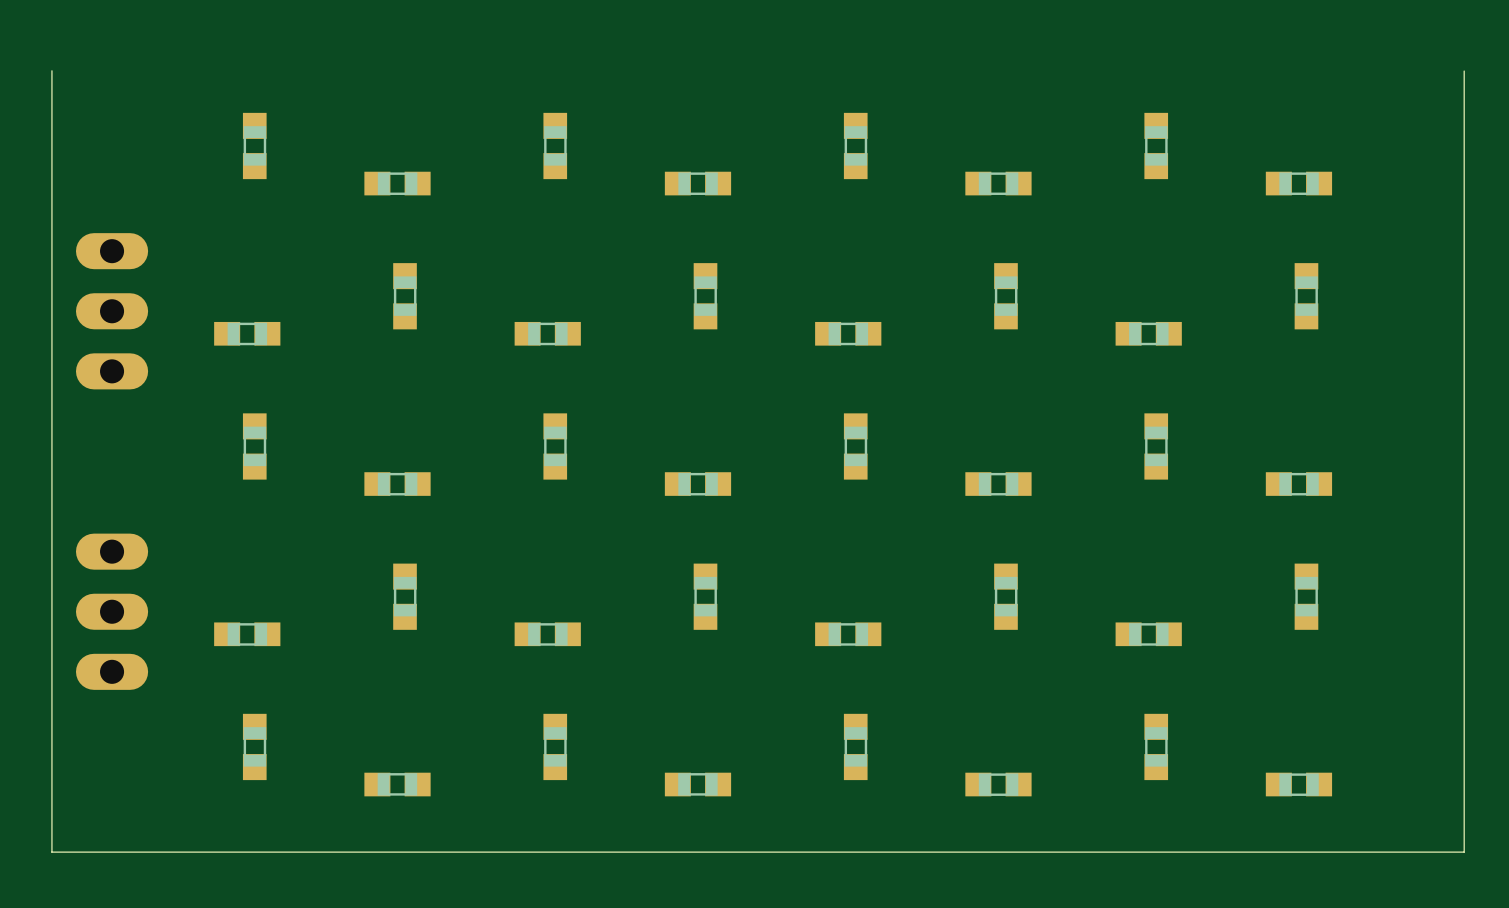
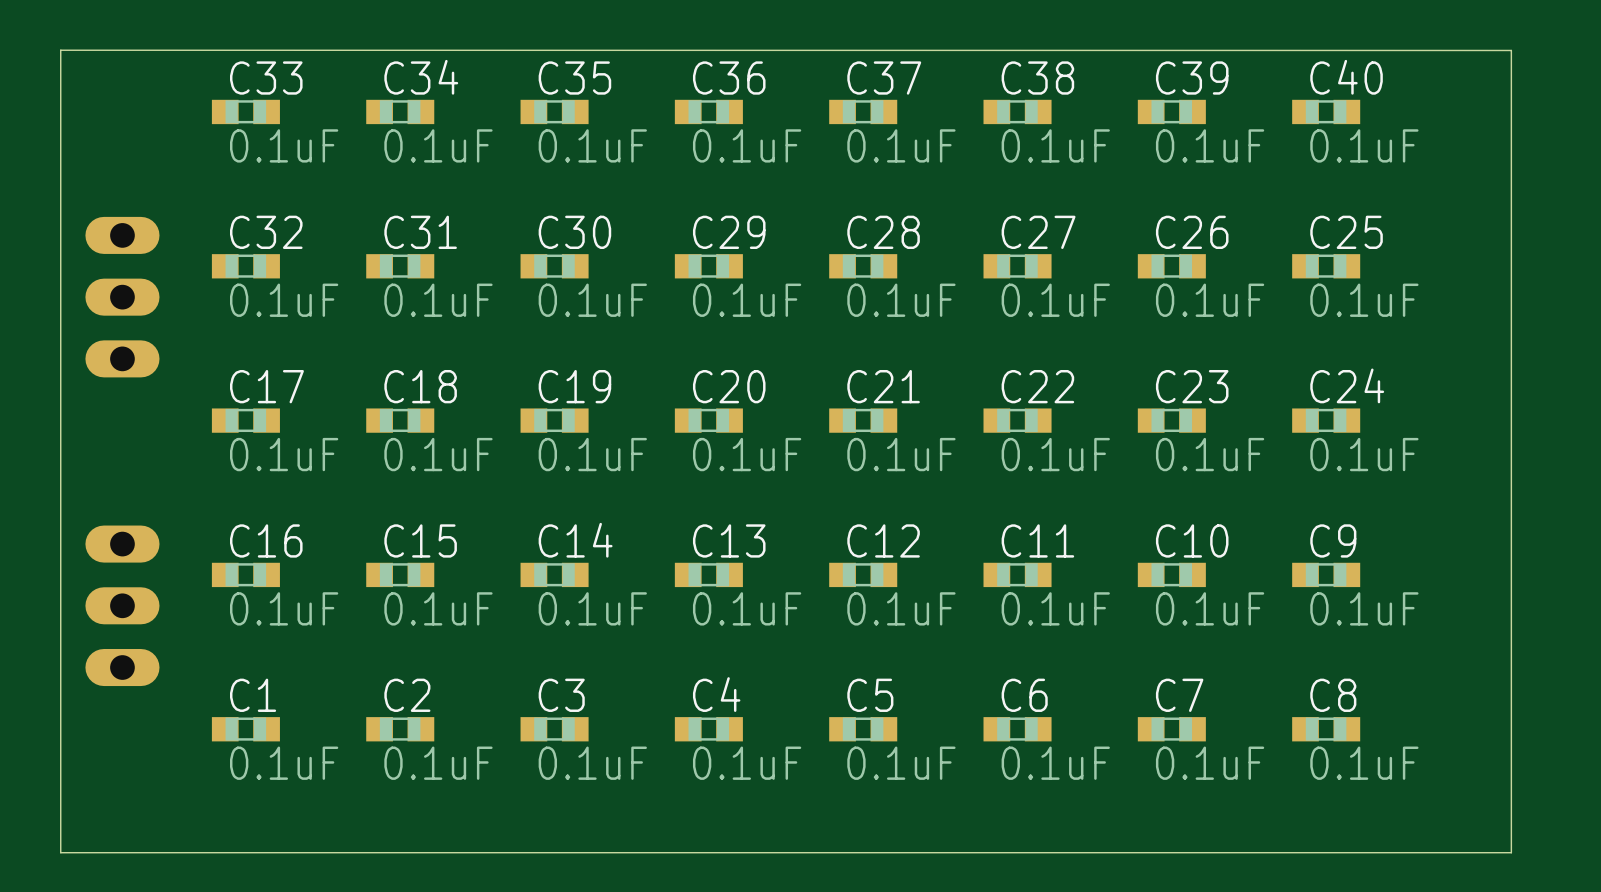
board edge: none -> (60, 50) (1511, 50)
C33: none -> 0.1uF (245, 111)
C34: none -> 0.1uF (400, 111)
C35: none -> 0.1uF (554, 111)
C36: none -> 0.1uF (708, 111)
C37: none -> 0.1uF (863, 111)
C38: none -> 0.1uF (1017, 111)
C39: none -> 0.1uF (1171, 111)
C40: none -> 0.1uF (1326, 111)
part: (254, 145) -> none
part: (555, 145) -> none
part: (855, 145) -> none
part: (1156, 145) -> none
part: (397, 183) -> none
part: (697, 183) -> none
part: (998, 183) -> none
part: (1298, 183) -> none
C32: none -> 0.1uF (245, 266)
C31: none -> 0.1uF (400, 266)
C30: none -> 0.1uF (554, 266)
C29: none -> 0.1uF (708, 266)
C28: none -> 0.1uF (863, 266)
C27: none -> 0.1uF (1017, 266)
C26: none -> 0.1uF (1171, 266)
C25: none -> 0.1uF (1326, 266)
part: (405, 296) -> none
part: (705, 296) -> none
part: (1005, 296) -> none
part: (1306, 296) -> none
part: (247, 333) -> none
part: (547, 333) -> none
part: (848, 333) -> none
part: (1148, 333) -> none
C17: none -> 0.1uF (245, 420)
C18: none -> 0.1uF (400, 420)
C19: none -> 0.1uF (554, 420)
C20: none -> 0.1uF (708, 420)
C21: none -> 0.1uF (863, 420)
C22: none -> 0.1uF (1017, 420)
C23: none -> 0.1uF (1171, 420)
C24: none -> 0.1uF (1326, 420)
part: (254, 446) -> none
part: (555, 446) -> none
part: (855, 446) -> none
part: (1156, 446) -> none
part: (397, 484) -> none
part: (697, 484) -> none
part: (998, 484) -> none
part: (1298, 484) -> none
C16: none -> 0.1uF (245, 574)
C15: none -> 0.1uF (400, 574)
C14: none -> 0.1uF (554, 574)
C13: none -> 0.1uF (708, 574)
C12: none -> 0.1uF (863, 574)
C11: none -> 0.1uF (1017, 574)
C10: none -> 0.1uF (1171, 574)
C9: none -> 0.1uF (1326, 574)
part: (405, 596) -> none
part: (705, 596) -> none
part: (1005, 596) -> none
part: (1306, 596) -> none
part: (247, 634) -> none
part: (547, 634) -> none
part: (848, 634) -> none
part: (1148, 634) -> none
C1: none -> 0.1uF (245, 729)
C2: none -> 0.1uF (400, 729)
C3: none -> 0.1uF (554, 729)
C4: none -> 0.1uF (708, 729)
C5: none -> 0.1uF (863, 729)
C6: none -> 0.1uF (1017, 729)
C7: none -> 0.1uF (1171, 729)
C8: none -> 0.1uF (1326, 729)
part: (254, 746) -> none
part: (555, 746) -> none
part: (855, 746) -> none
part: (1156, 746) -> none
part: (397, 784) -> none
part: (697, 784) -> none
part: (998, 784) -> none
part: (1298, 784) -> none

